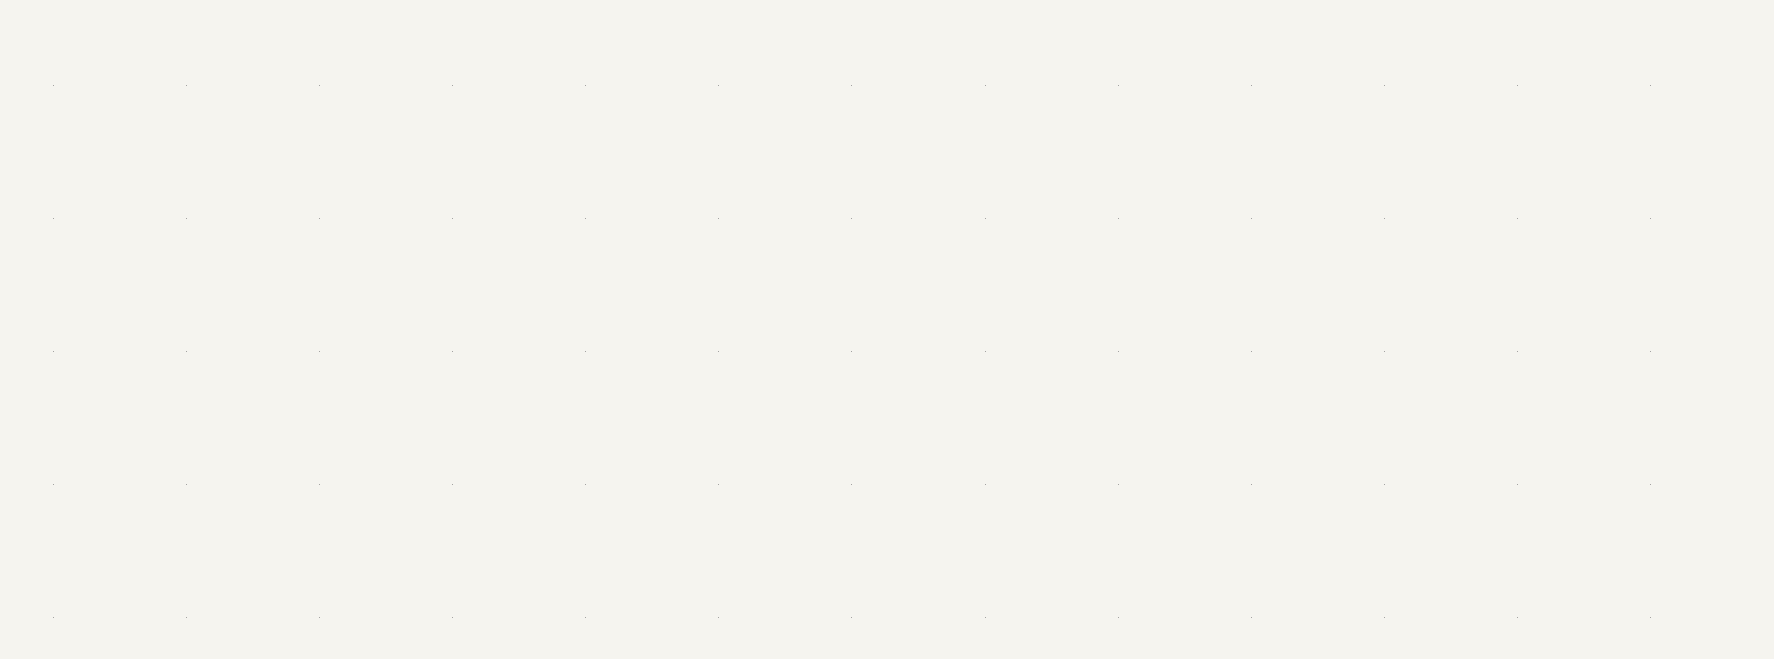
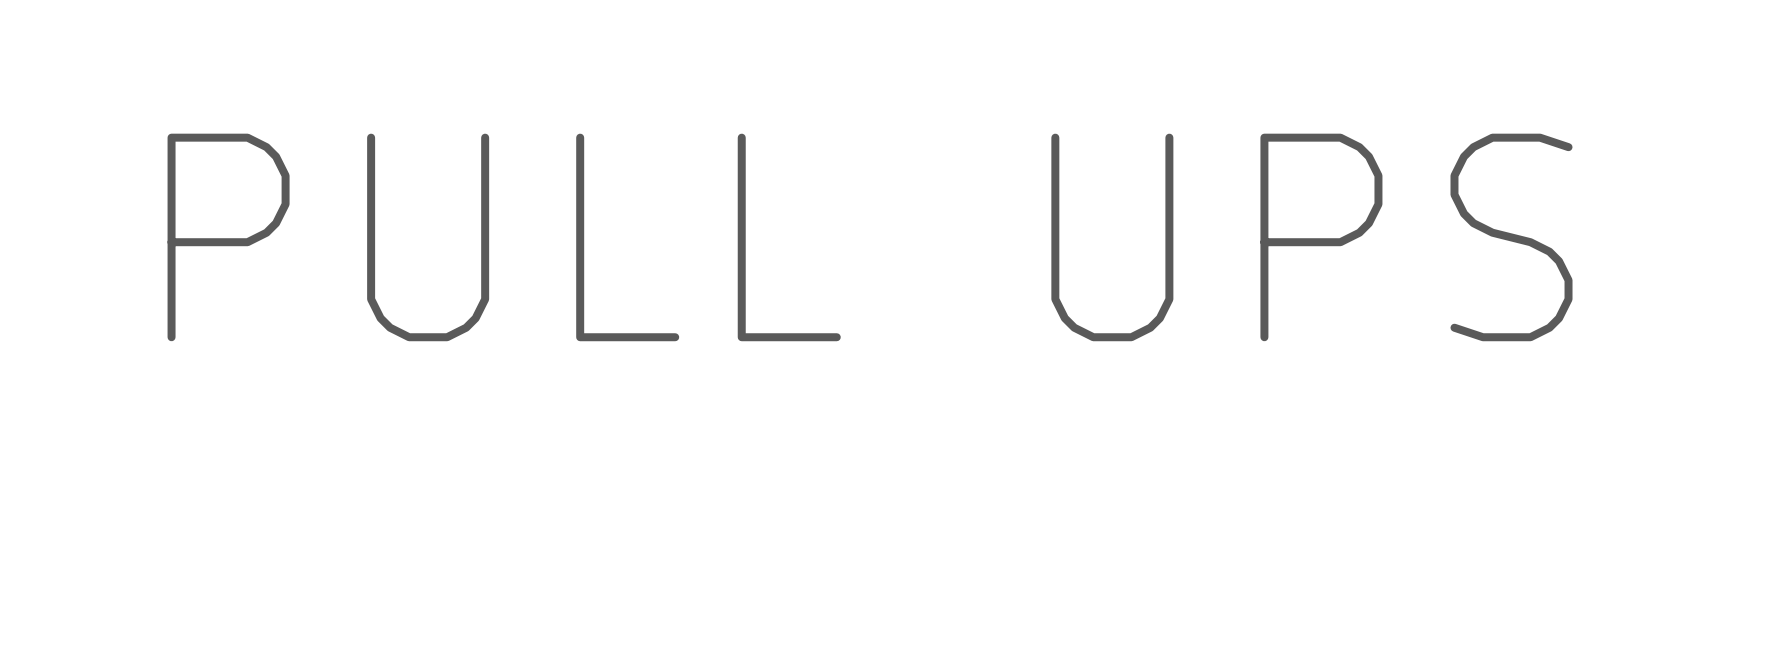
text: none -> PULL UPS (870, 237)

